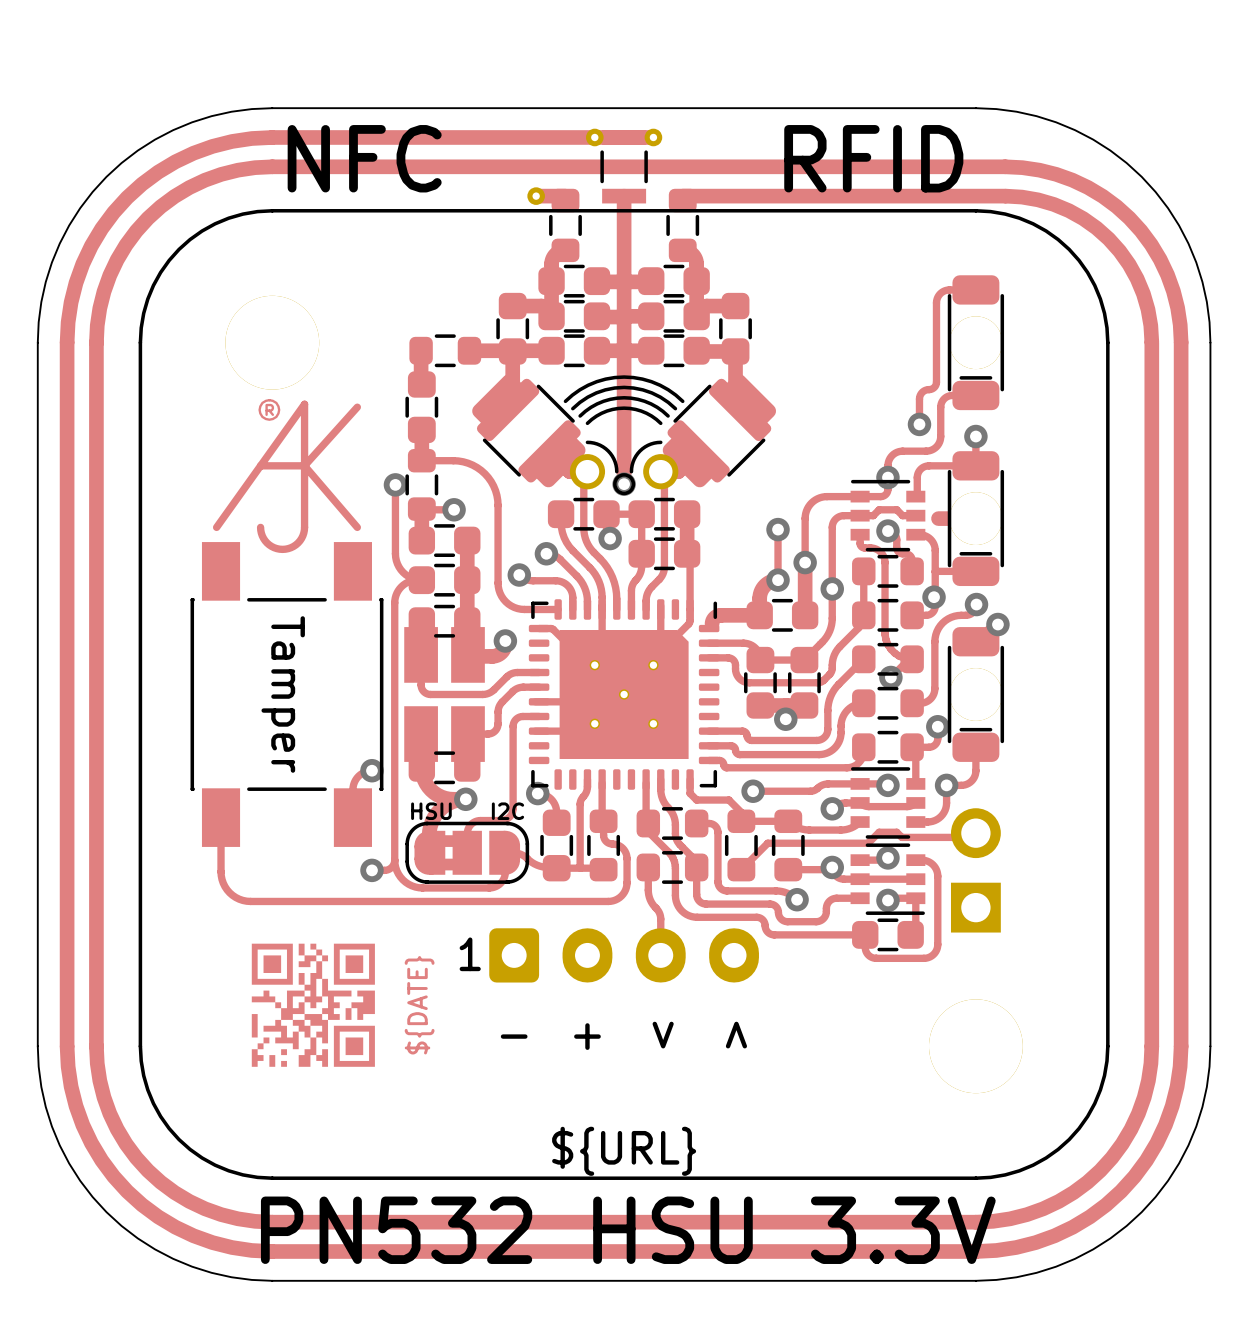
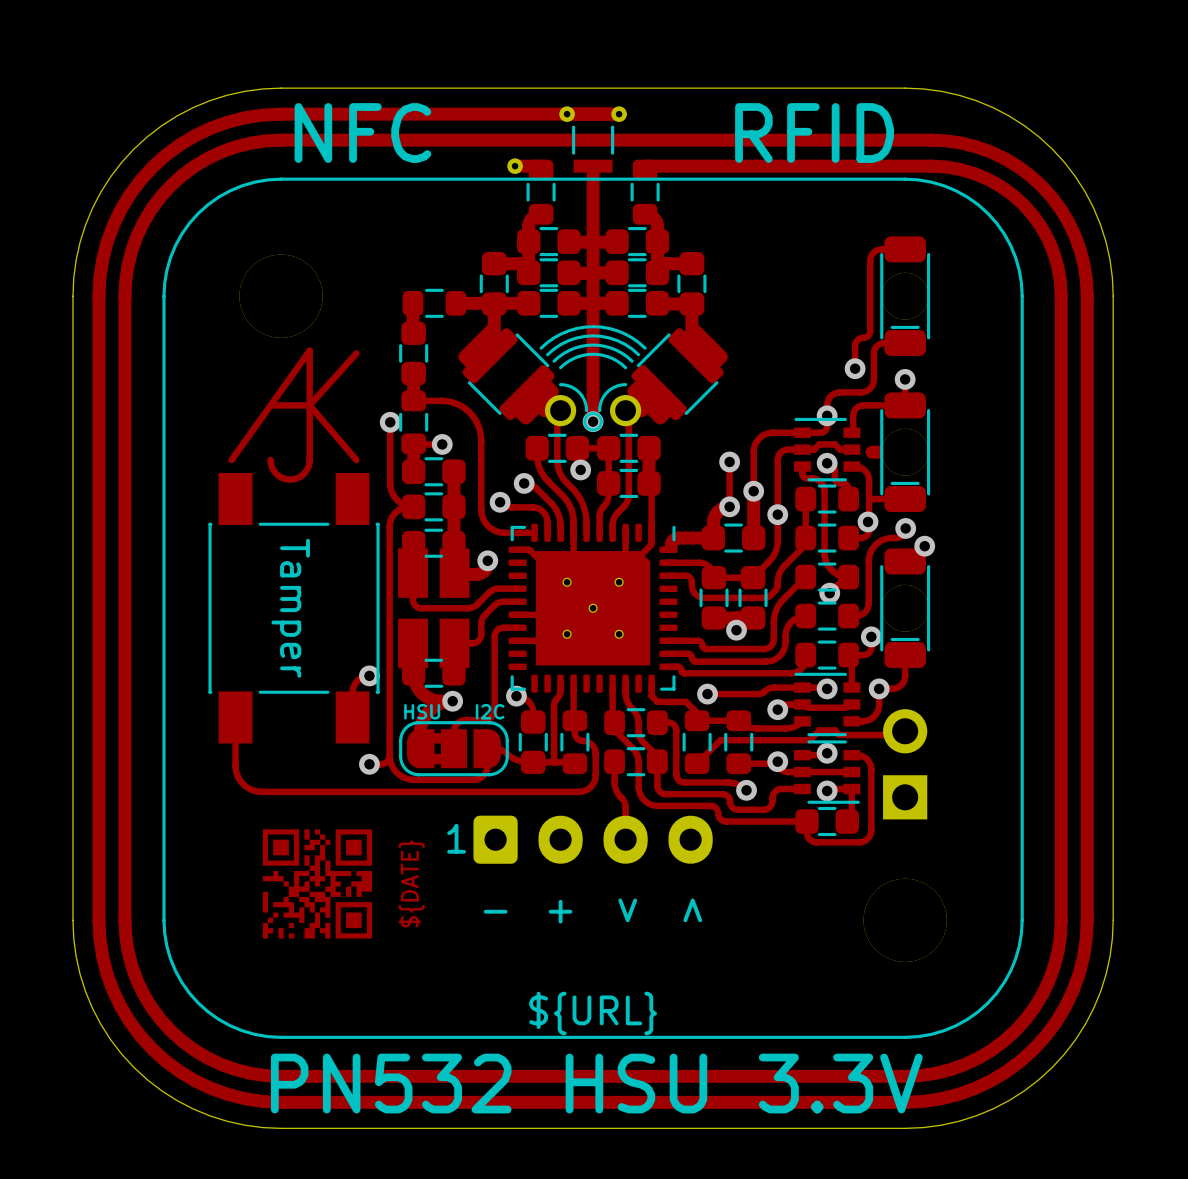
drawing shape: [212, 398, 362, 554] -> [228, 347, 360, 483]

